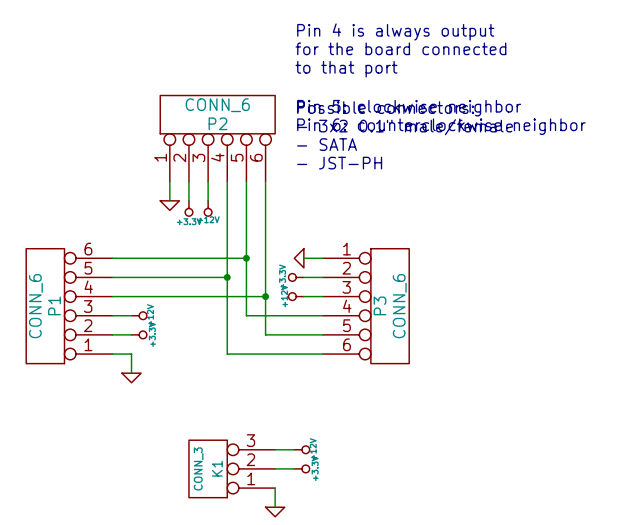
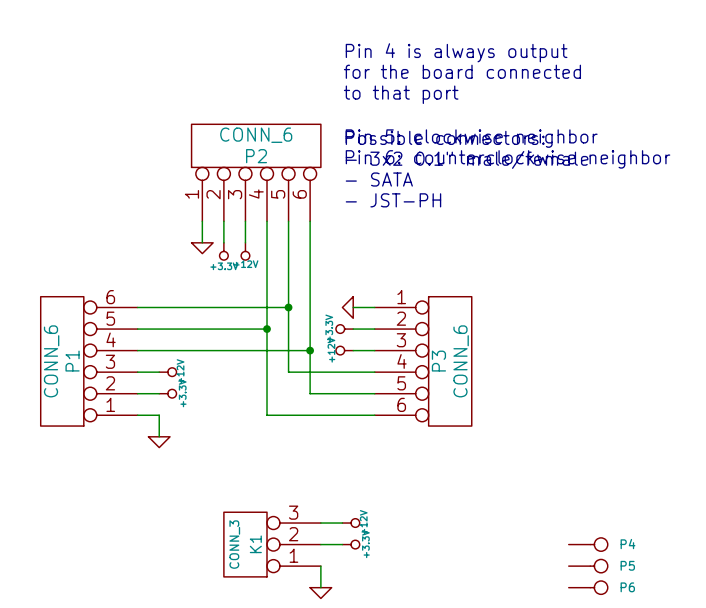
P4: none -> (588, 544)
P5: none -> (588, 566)
P6: none -> (588, 587)

